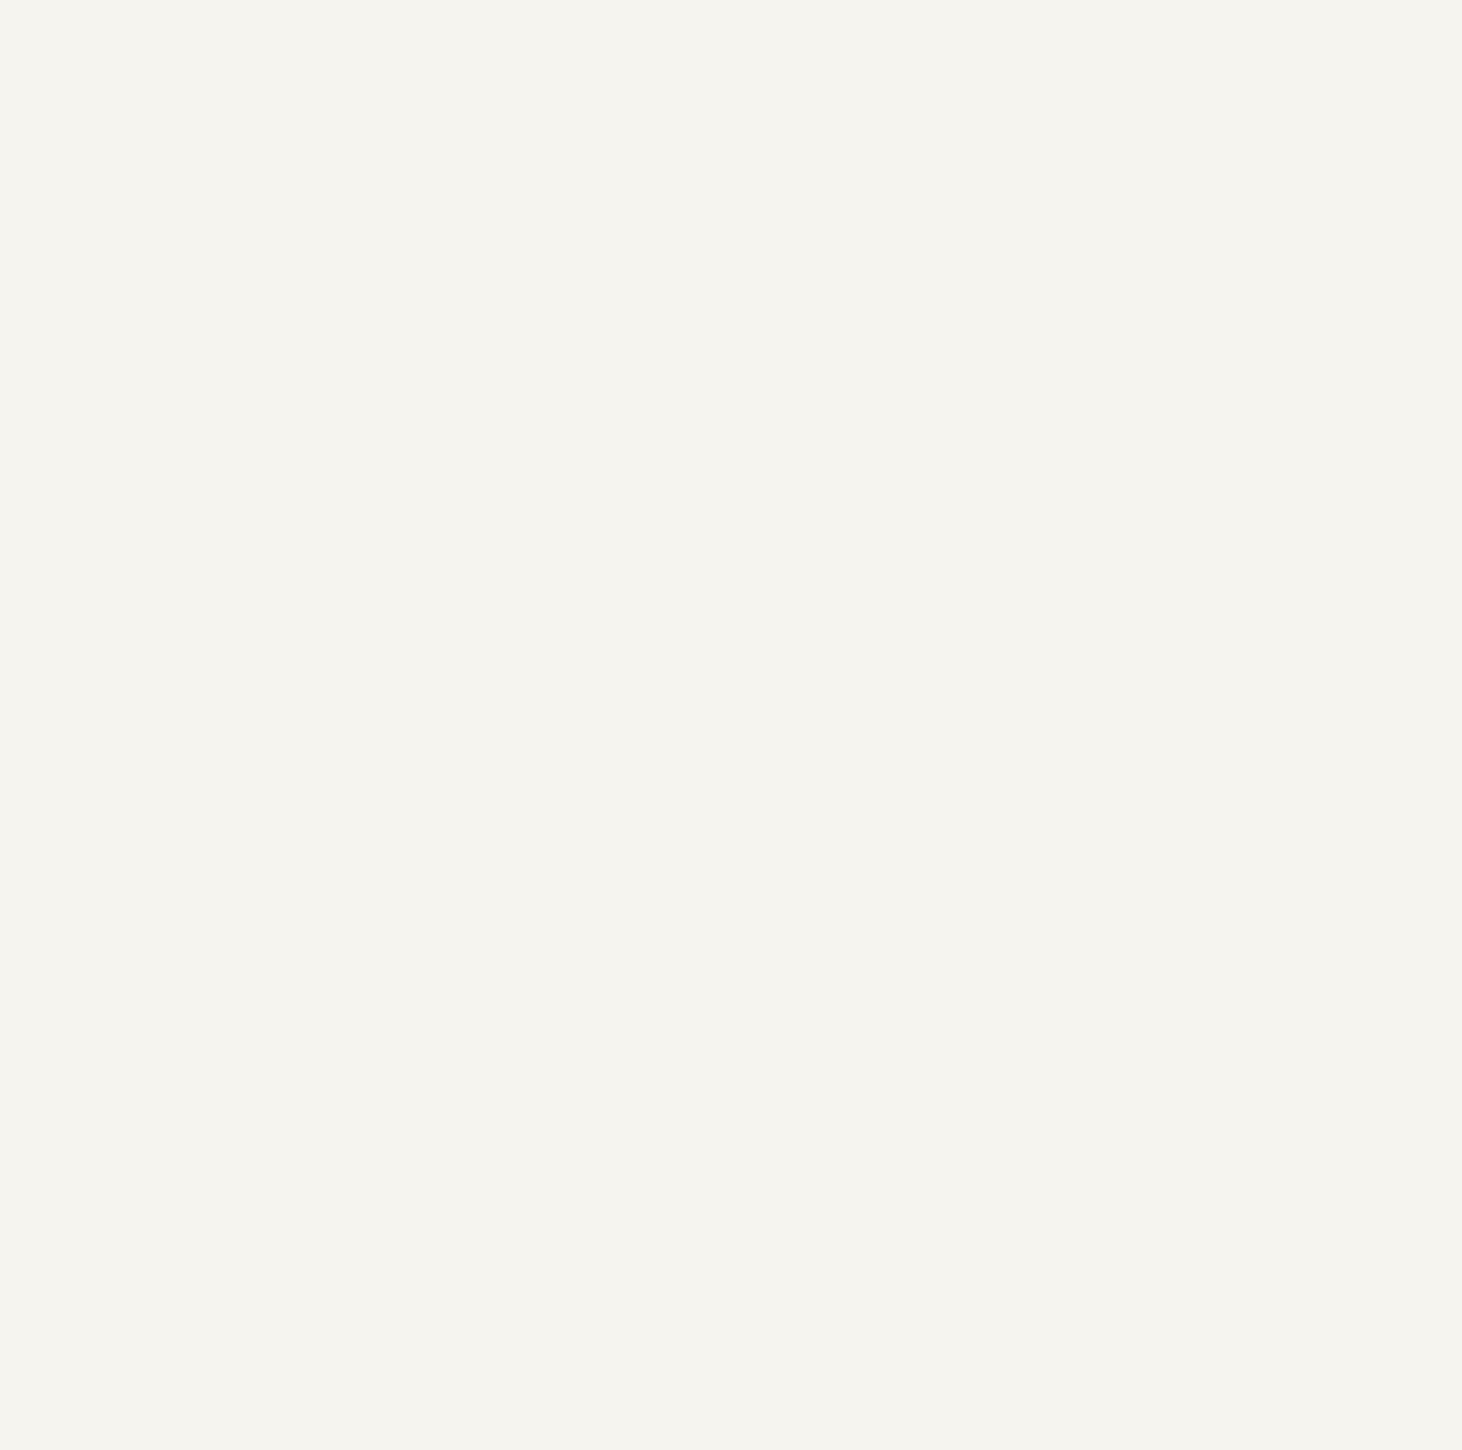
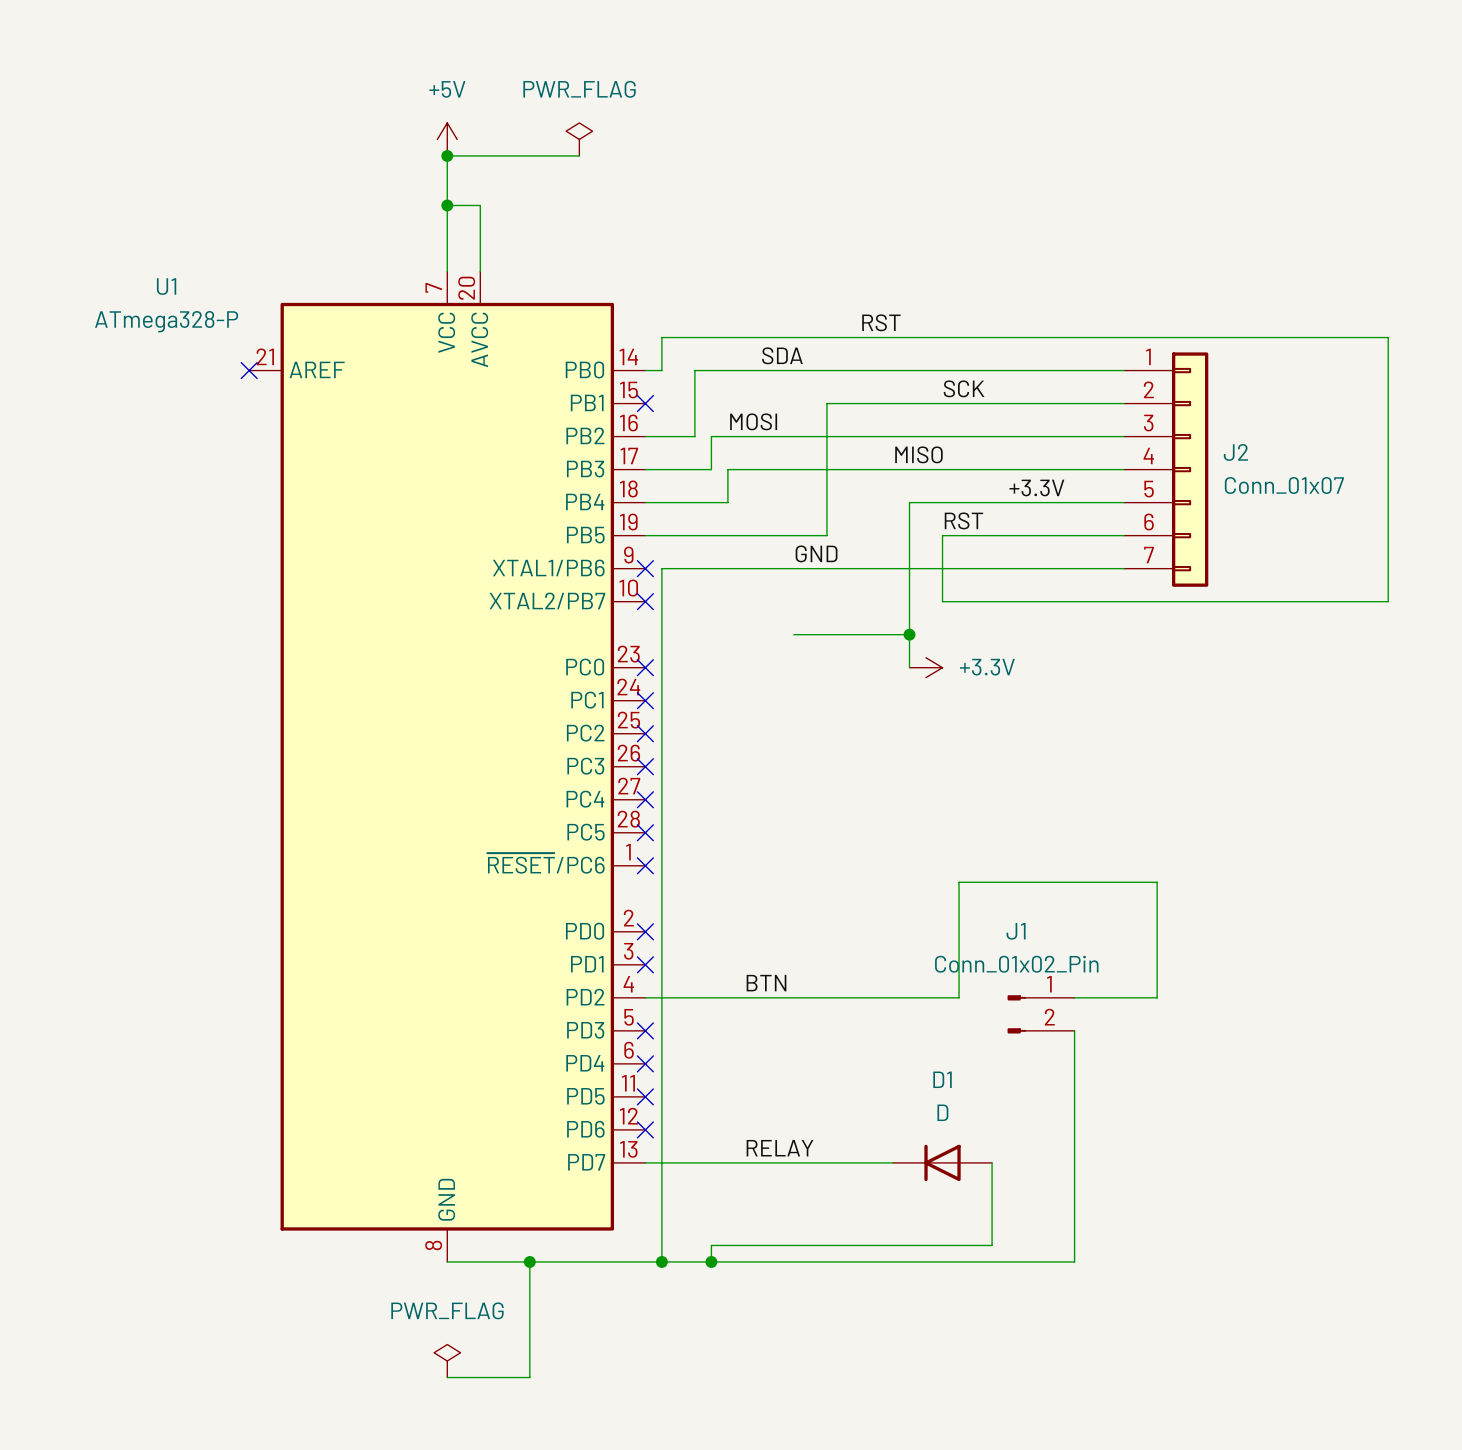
power symbol: none -> +5V (447, 139)
power symbol: none -> PWR_FLAG (579, 139)
junction: none -> (447, 155)
wire: none -> (579, 155) (447, 155) (447, 271)
wire: none -> (447, 205) (480, 205) (480, 271)
junction: none -> (447, 205)
label: none -> RST (881, 322)
label: none -> SDA (782, 355)
no-connect mark: none -> (249, 370)
wire: none -> (645, 370) (661, 370) (661, 337) (1388, 337) (1388, 601) (942, 601) (942, 535) (1124, 535)
wire: none -> (1124, 370) (694, 370) (694, 436) (645, 436)
label: none -> SCK (964, 388)
no-connect mark: none -> (645, 403)
wire: none -> (1124, 403) (826, 403) (826, 535) (645, 535)
label: none -> MOSI (753, 421)
wire: none -> (1124, 436) (711, 436) (711, 469) (645, 469)
label: none -> MISO (918, 454)
wire: none -> (1124, 469) (727, 469) (727, 502) (645, 502)
J2: none -> Conn_01x07 (1166, 469)
label: none -> +3.3V (1036, 487)
wire: none -> (1124, 502) (909, 502) (909, 667)
label: none -> RST (963, 520)
label: none -> GND (816, 553)
no-connect mark: none -> (645, 568)
wire: none -> (1124, 568) (661, 568) (661, 1261)
no-connect mark: none -> (645, 601)
wire: none -> (793, 634) (909, 634)
junction: none -> (909, 634)
no-connect mark: none -> (645, 667)
power symbol: none -> +3.3V (926, 667)
no-connect mark: none -> (645, 700)
no-connect mark: none -> (645, 733)
U1: none -> ATmega328-P (447, 766)
no-connect mark: none -> (645, 766)
no-connect mark: none -> (645, 799)
no-connect mark: none -> (645, 832)
no-connect mark: none -> (645, 865)
no-connect mark: none -> (645, 931)
no-connect mark: none -> (645, 964)
label: none -> BTN (766, 983)
wire: none -> (645, 997) (959, 997) (959, 882) (1157, 882) (1157, 997) (1074, 997)
J1: none -> Conn_01x02_Pin (1041, 1014)
no-connect mark: none -> (645, 1030)
wire: none -> (1074, 1030) (1074, 1261) (447, 1261)
no-connect mark: none -> (645, 1063)
no-connect mark: none -> (645, 1096)
no-connect mark: none -> (645, 1129)
label: none -> RELAY (780, 1148)
wire: none -> (645, 1162) (893, 1162)
D1: none -> D (942, 1162)
wire: none -> (992, 1162) (992, 1245) (711, 1245) (711, 1261)
wire: none -> (529, 1261) (529, 1377) (447, 1377)
junction: none -> (529, 1261)
junction: none -> (661, 1261)
junction: none -> (711, 1261)
power symbol: none -> PWR_FLAG (447, 1361)

